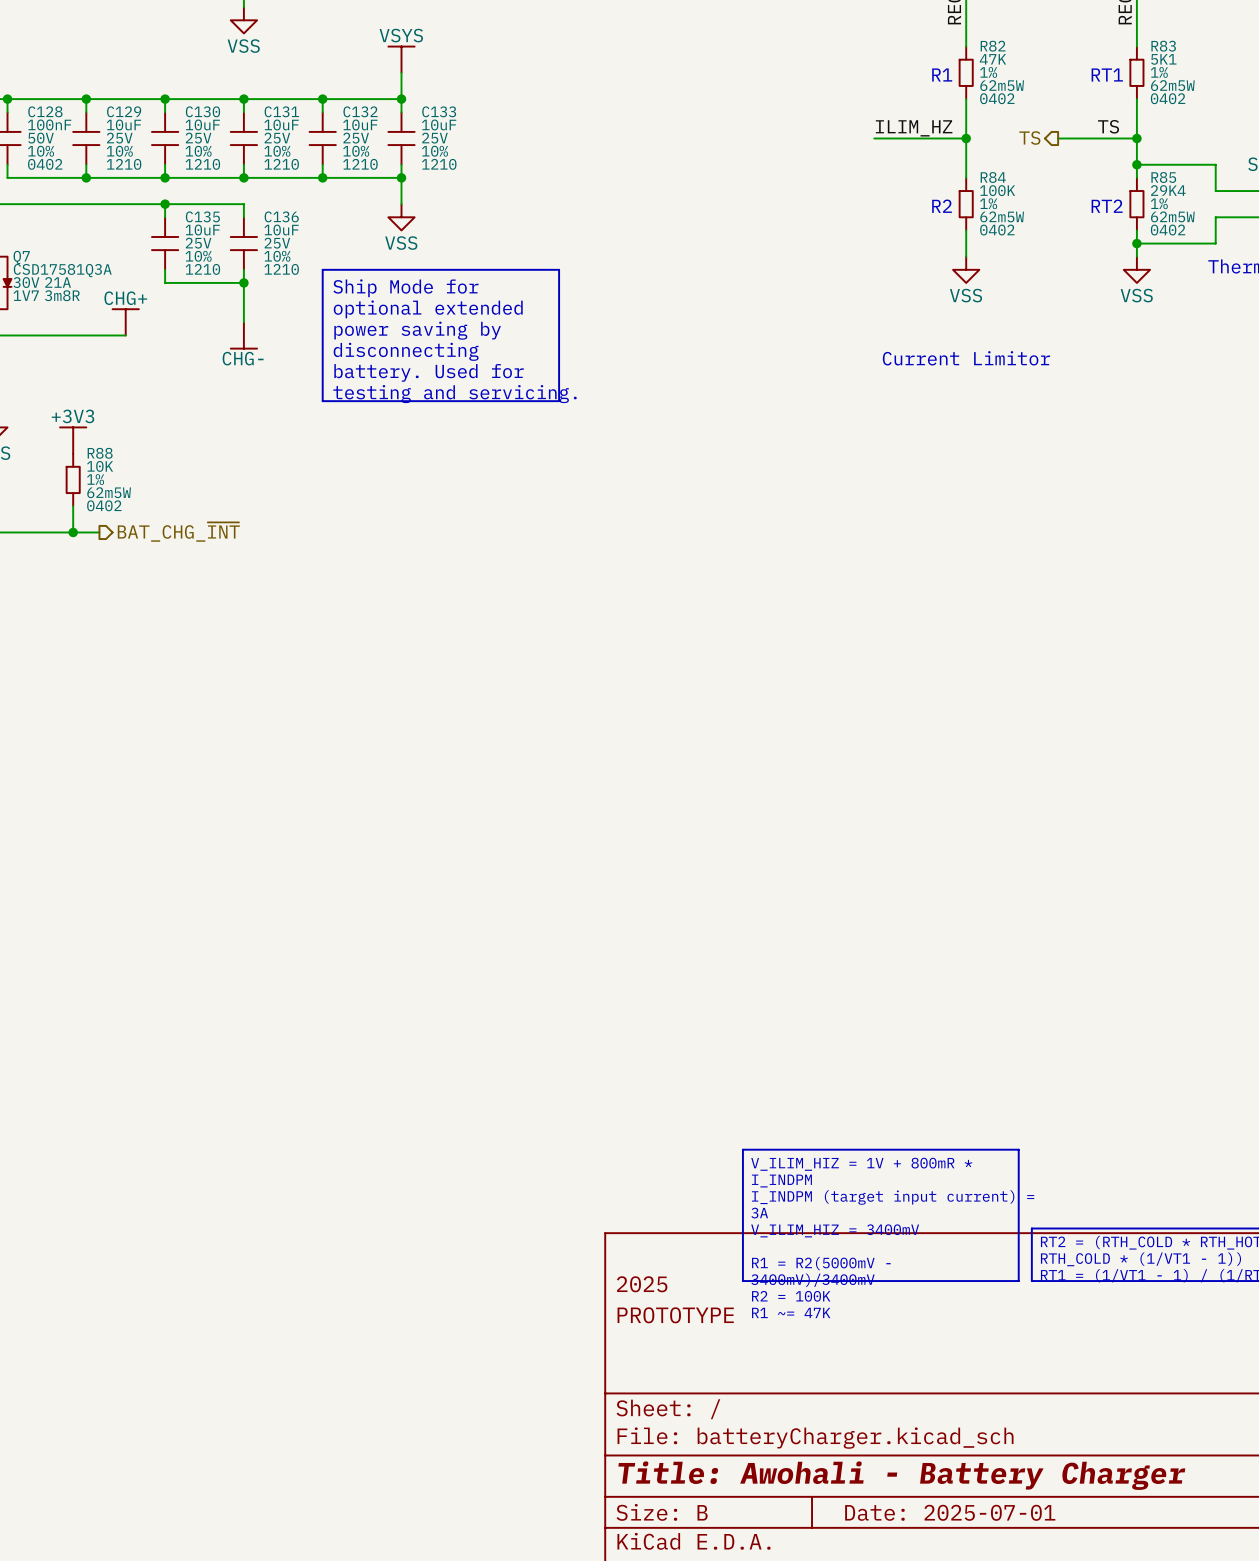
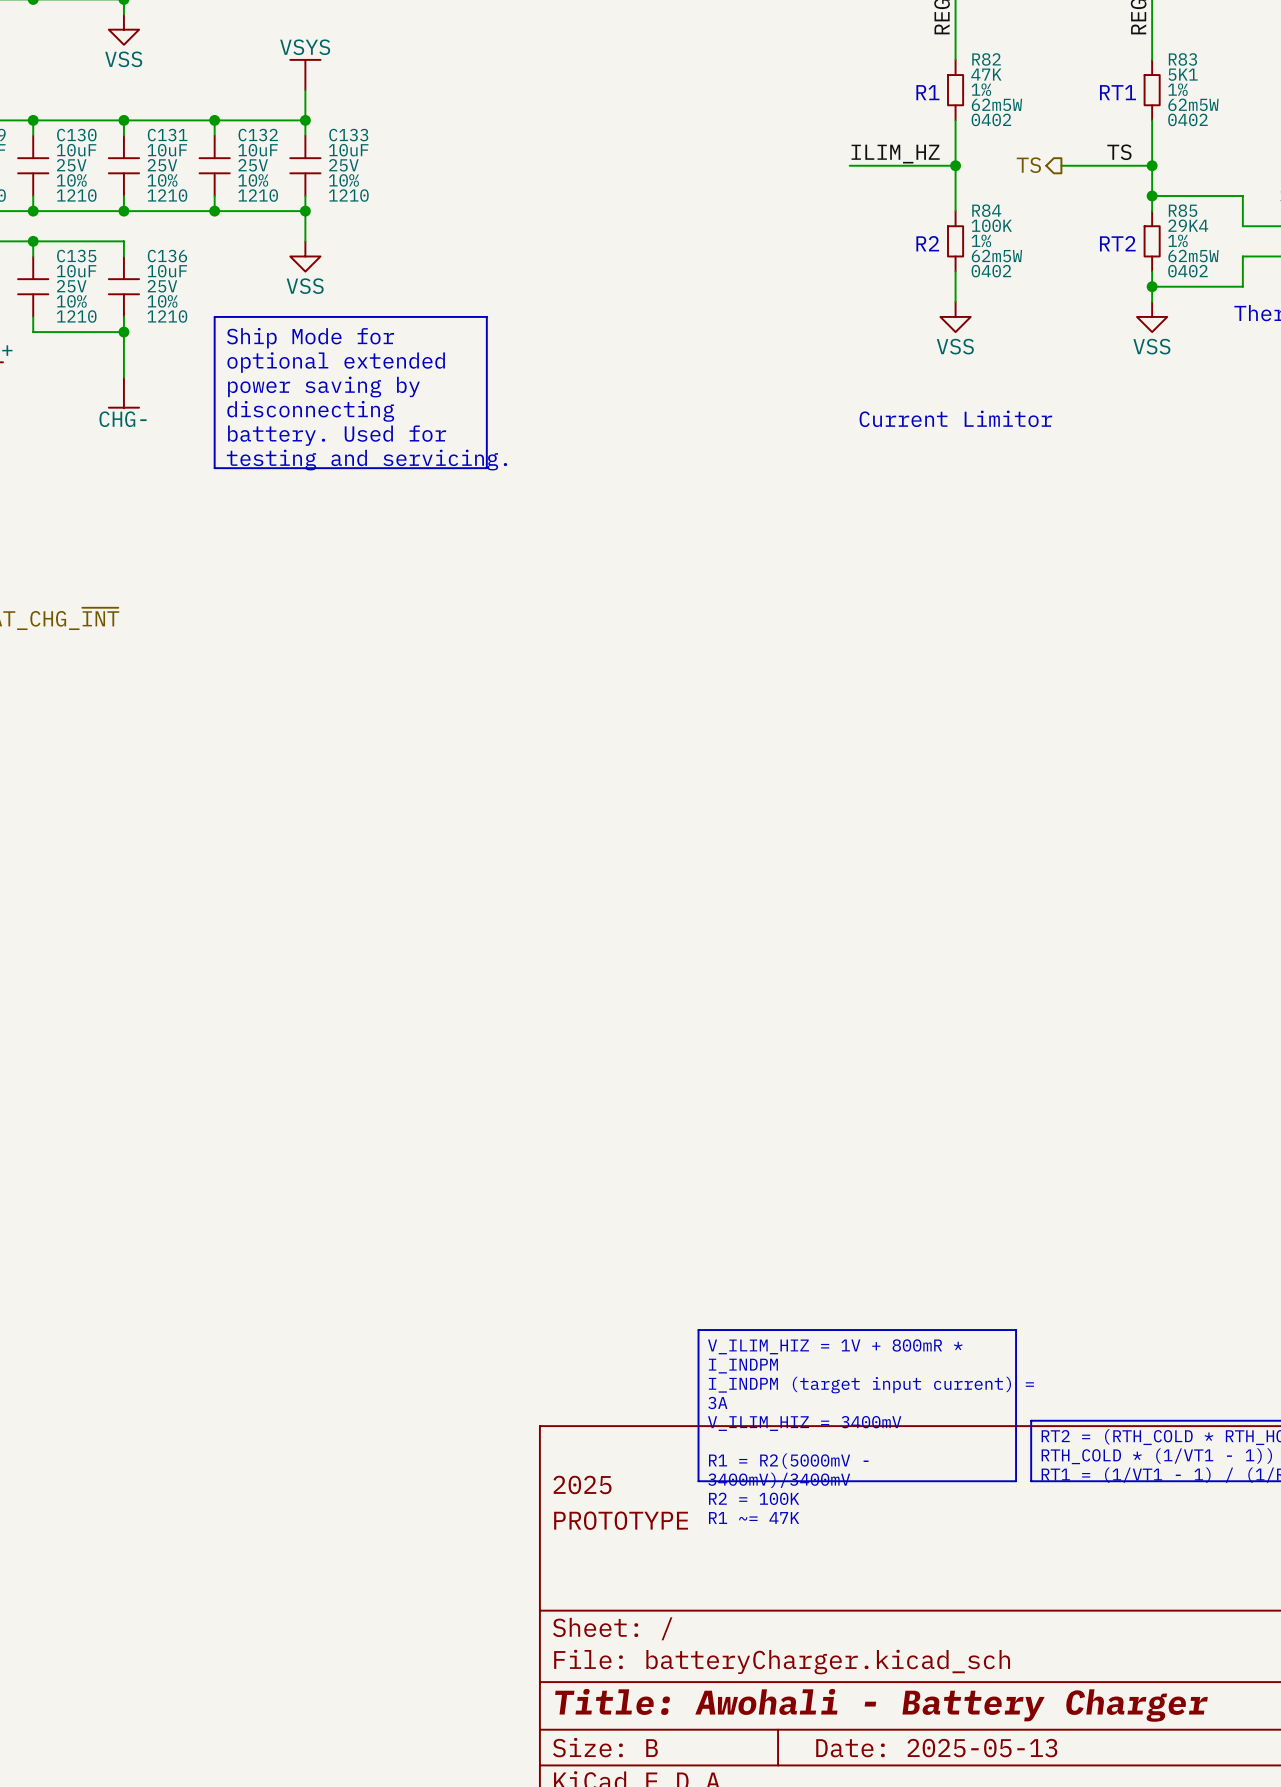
title block: Date: 2025-07-01 (950, 1512) -> Date: 2025-05-13 (936, 1748)

